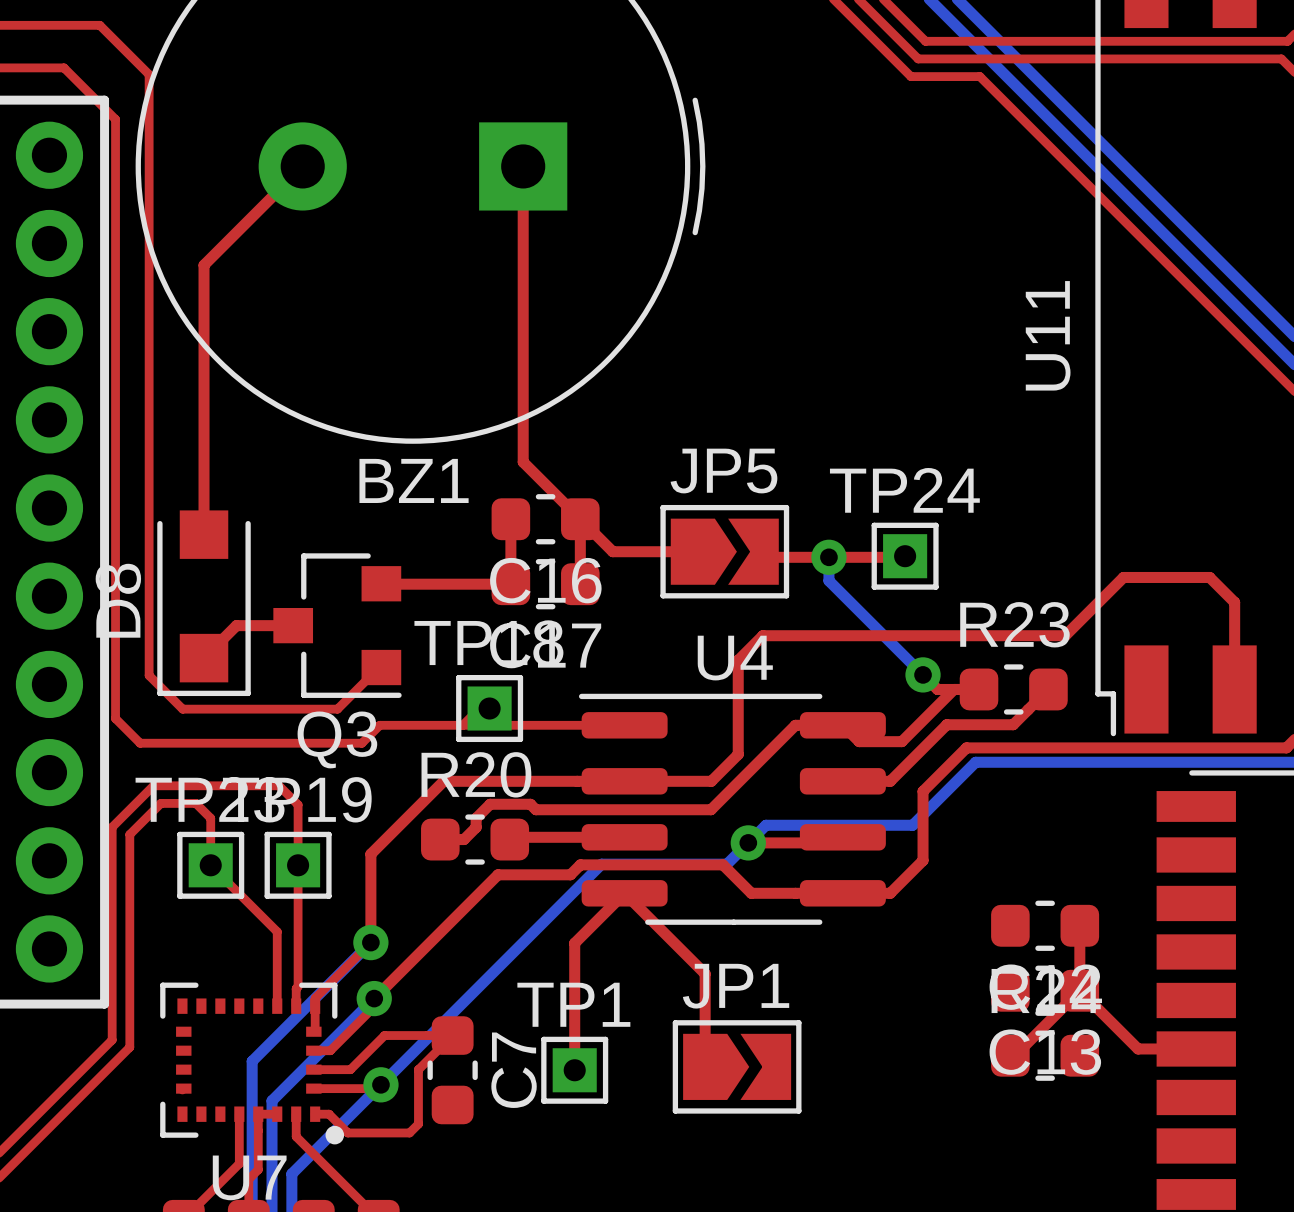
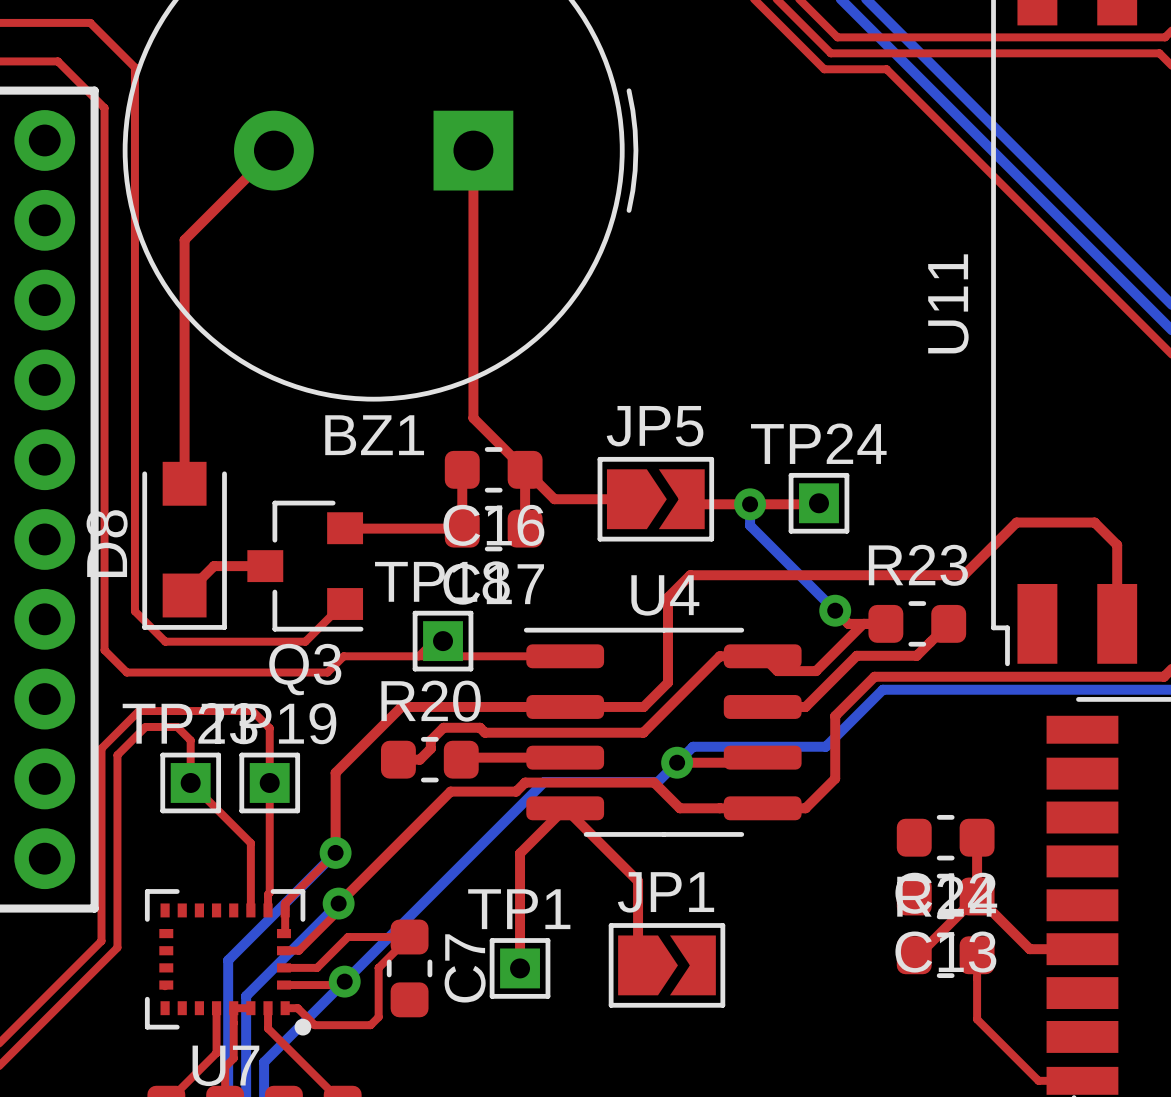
top track: none -> (977, 955) (977, 1019) (1038, 1080) (1082, 1080)

